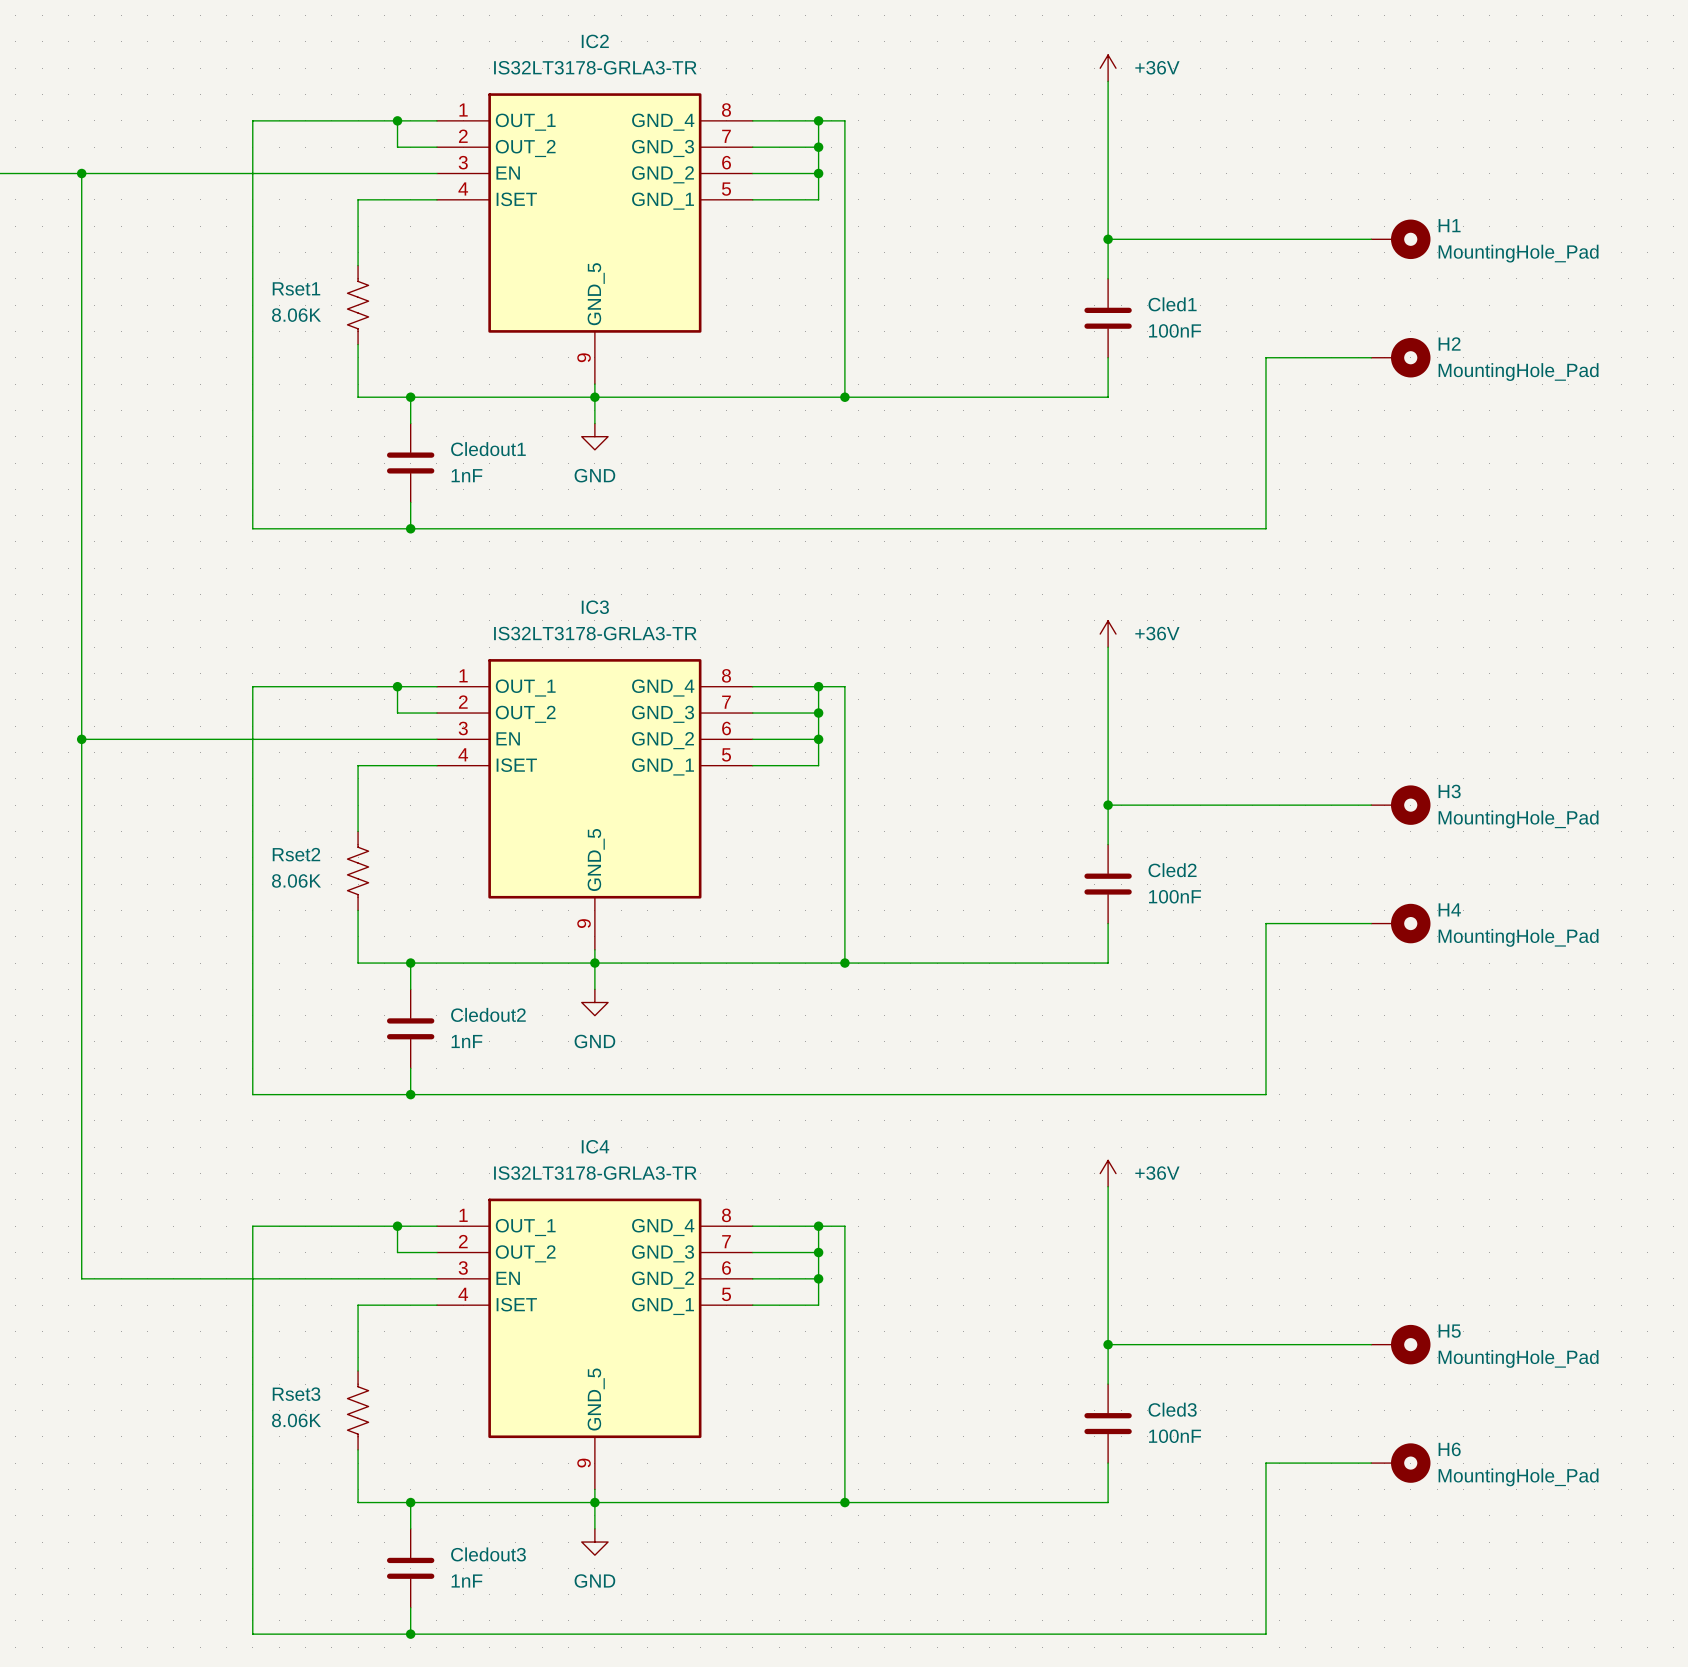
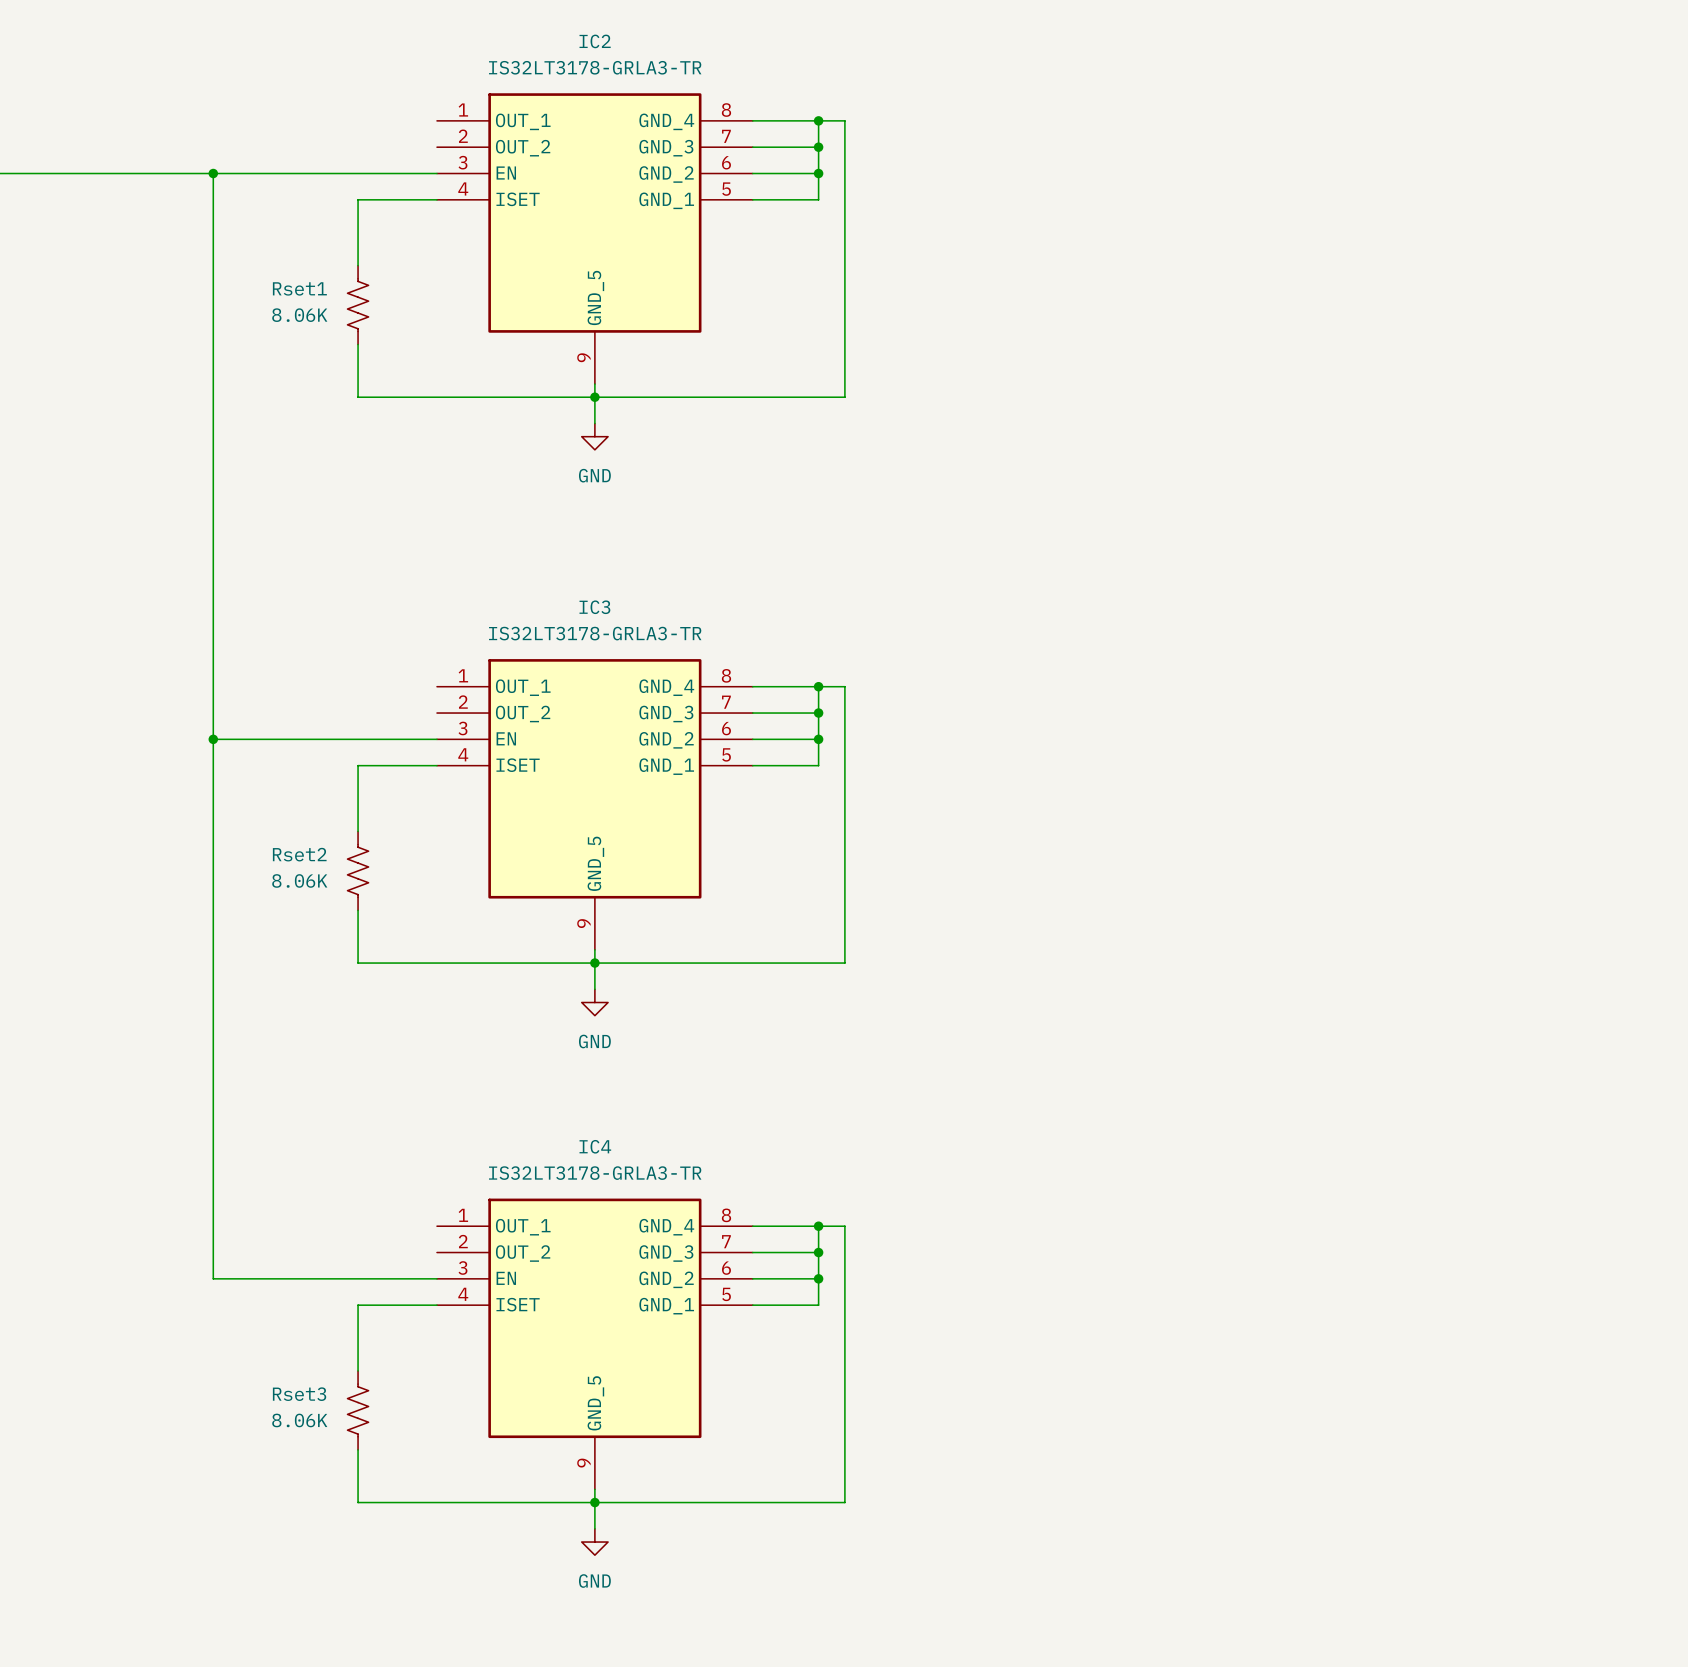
power symbol: +36V (1108, 68) -> none
wire: (1108, 81) (1108, 278) -> none
wire: (397, 120) (397, 147) (436, 147) -> none
junction: (397, 120) -> none
wire: (436, 120) (252, 120) (252, 528) (1265, 528) (1265, 357) (1371, 357) -> none
wire: (81, 173) (81, 1278) (213, 1278) -> (213, 173) (213, 1278)
junction: (81, 173) -> none
junction: none -> (213, 173)
wire: (1108, 239) (1371, 239) -> none
junction: (1108, 239) -> none
H1: MountingHole_Pad (1400, 239) -> none
Cled1: 100nF (1108, 318) -> none
wire: (1108, 357) (1108, 397) (844, 397) -> none
H2: MountingHole_Pad (1400, 357) -> none
wire: (410, 397) (410, 423) -> none
junction: (410, 397) -> none
junction: (844, 397) -> none
Cledout1: 1nF (410, 463) -> none
wire: (410, 502) (410, 528) -> none
junction: (410, 528) -> none
power symbol: +36V (1108, 634) -> none
wire: (1108, 647) (1108, 844) -> none
wire: (397, 686) (397, 713) (436, 713) -> none
junction: (397, 686) -> none
wire: (436, 686) (252, 686) (252, 1094) (1265, 1094) (1265, 923) (1371, 923) -> none
wire: (81, 739) (213, 739) -> none
junction: (81, 739) -> none
junction: none -> (213, 739)
wire: (1108, 805) (1371, 805) -> none
junction: (1108, 805) -> none
H3: MountingHole_Pad (1400, 805) -> none
Cled2: 100nF (1108, 884) -> none
wire: (1108, 923) (1108, 963) (844, 963) -> none
H4: MountingHole_Pad (1400, 923) -> none
wire: (410, 963) (410, 989) -> none
junction: (410, 963) -> none
junction: (844, 963) -> none
Cledout2: 1nF (410, 1028) -> none
wire: (410, 1068) (410, 1094) -> none
junction: (410, 1094) -> none
power symbol: +36V (1108, 1173) -> none
wire: (1108, 1186) (1108, 1384) -> none
wire: (397, 1226) (397, 1252) (436, 1252) -> none
junction: (397, 1226) -> none
wire: (436, 1226) (252, 1226) (252, 1634) (1265, 1634) (1265, 1463) (1371, 1463) -> none
wire: (1108, 1344) (1371, 1344) -> none
junction: (1108, 1344) -> none
H5: MountingHole_Pad (1400, 1344) -> none
Cled3: 100nF (1108, 1423) -> none
wire: (1108, 1463) (1108, 1502) (844, 1502) -> none
H6: MountingHole_Pad (1400, 1463) -> none
wire: (410, 1502) (410, 1528) -> none
junction: (410, 1502) -> none
junction: (844, 1502) -> none
Cledout3: 1nF (410, 1568) -> none
wire: (410, 1607) (410, 1634) -> none
junction: (410, 1634) -> none

